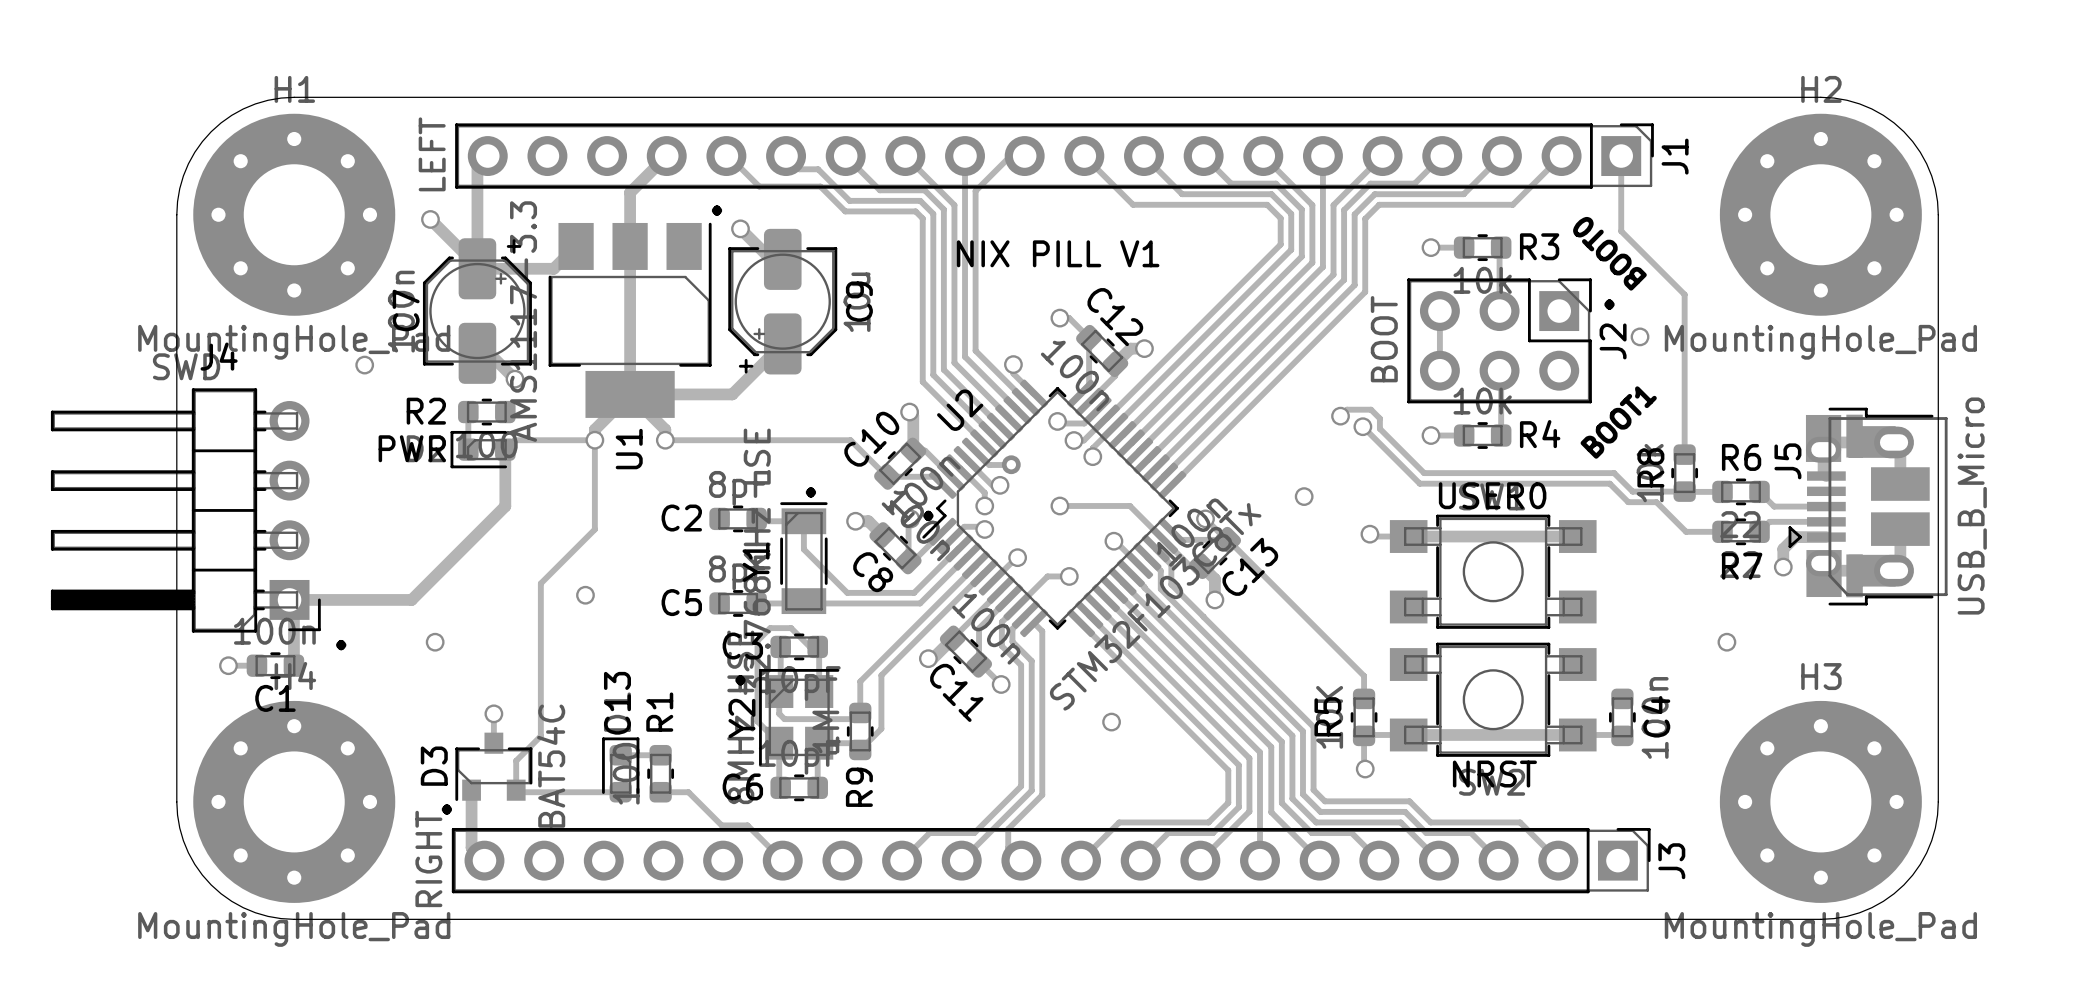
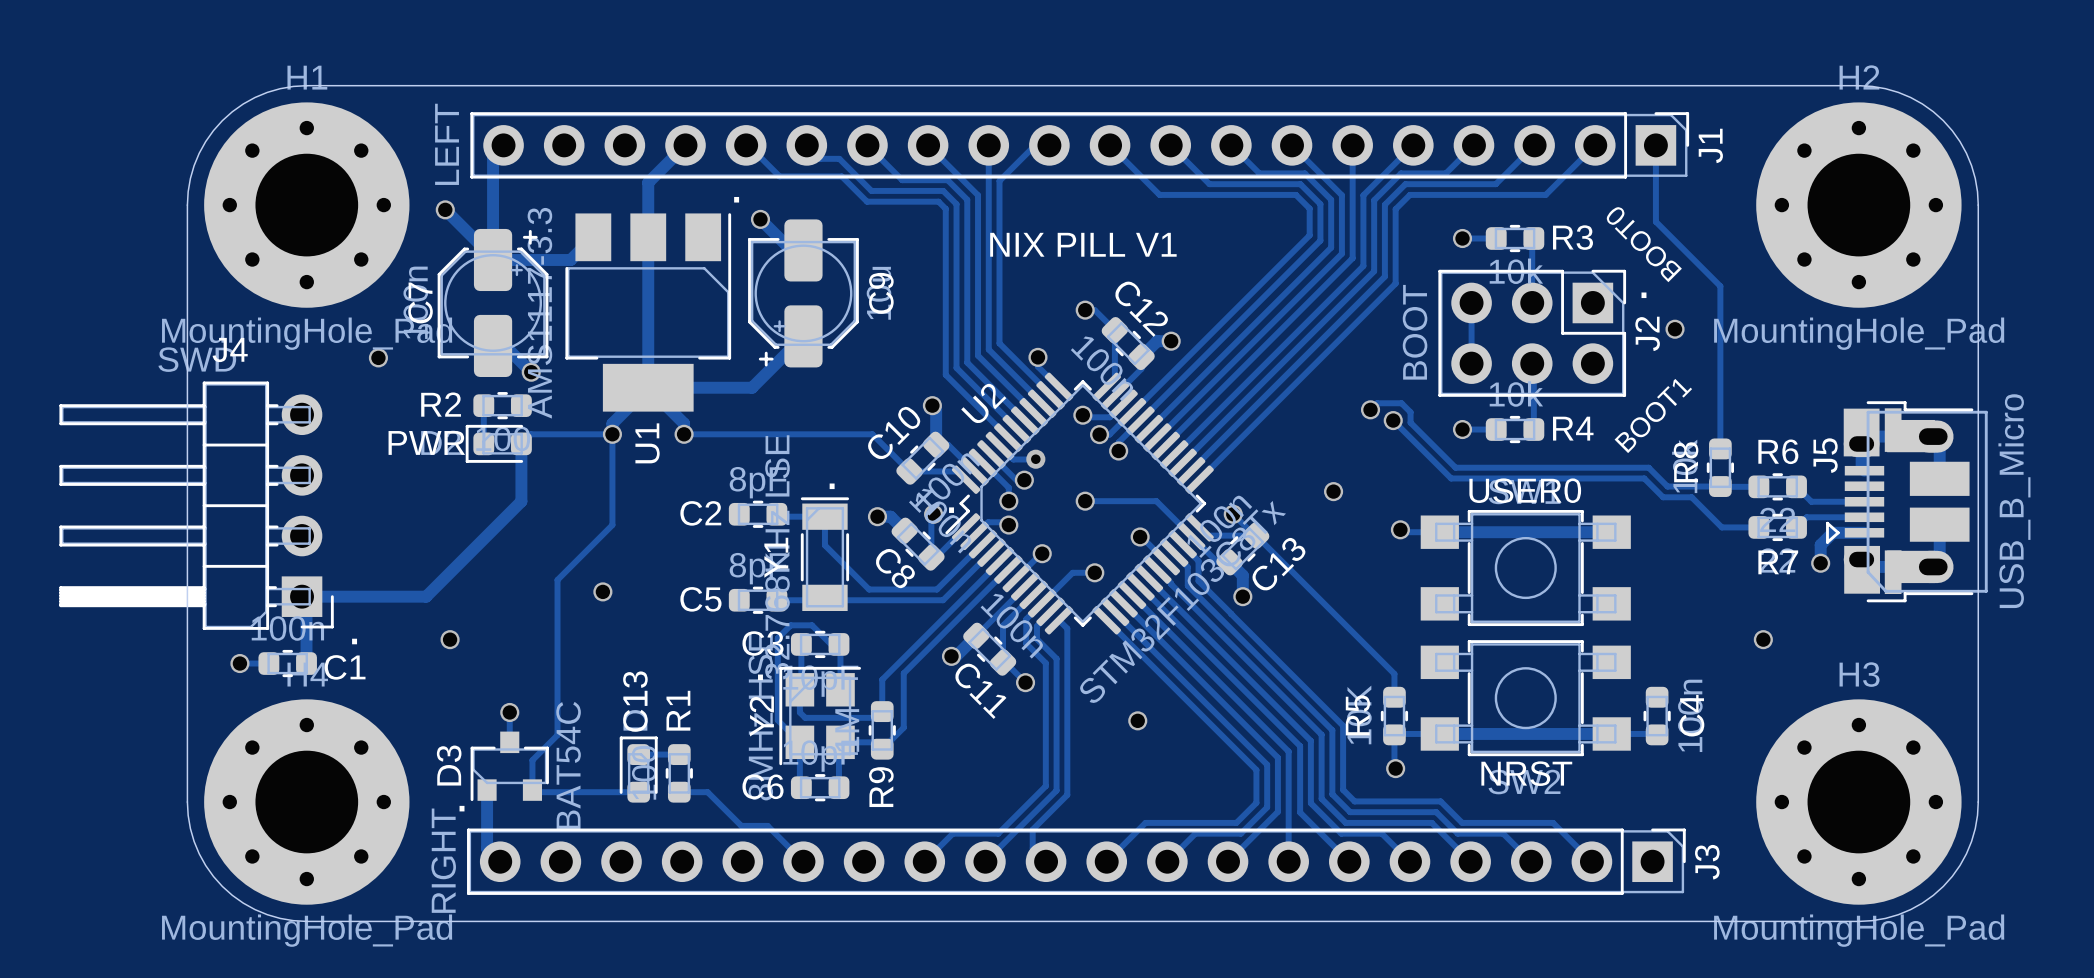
C1 name position: C1 (275, 698) -> C1 (345, 667)

